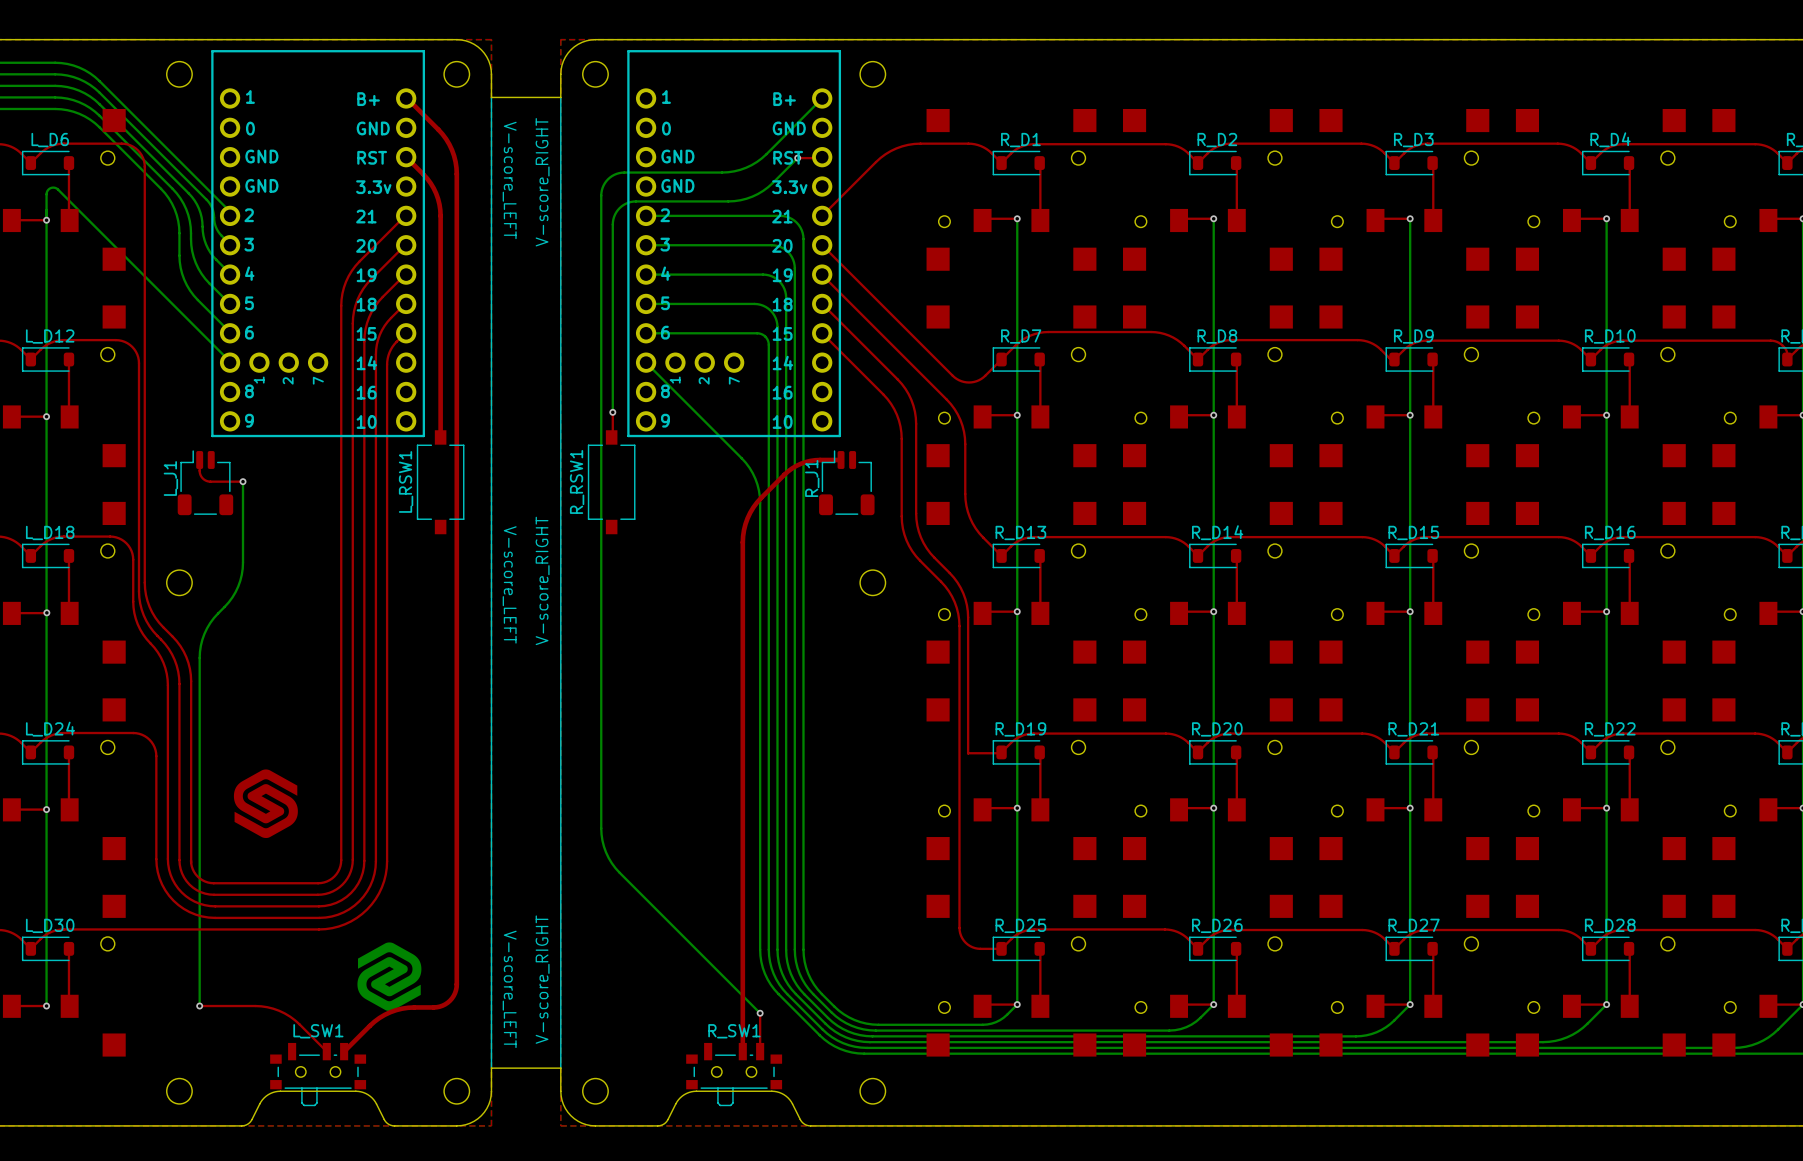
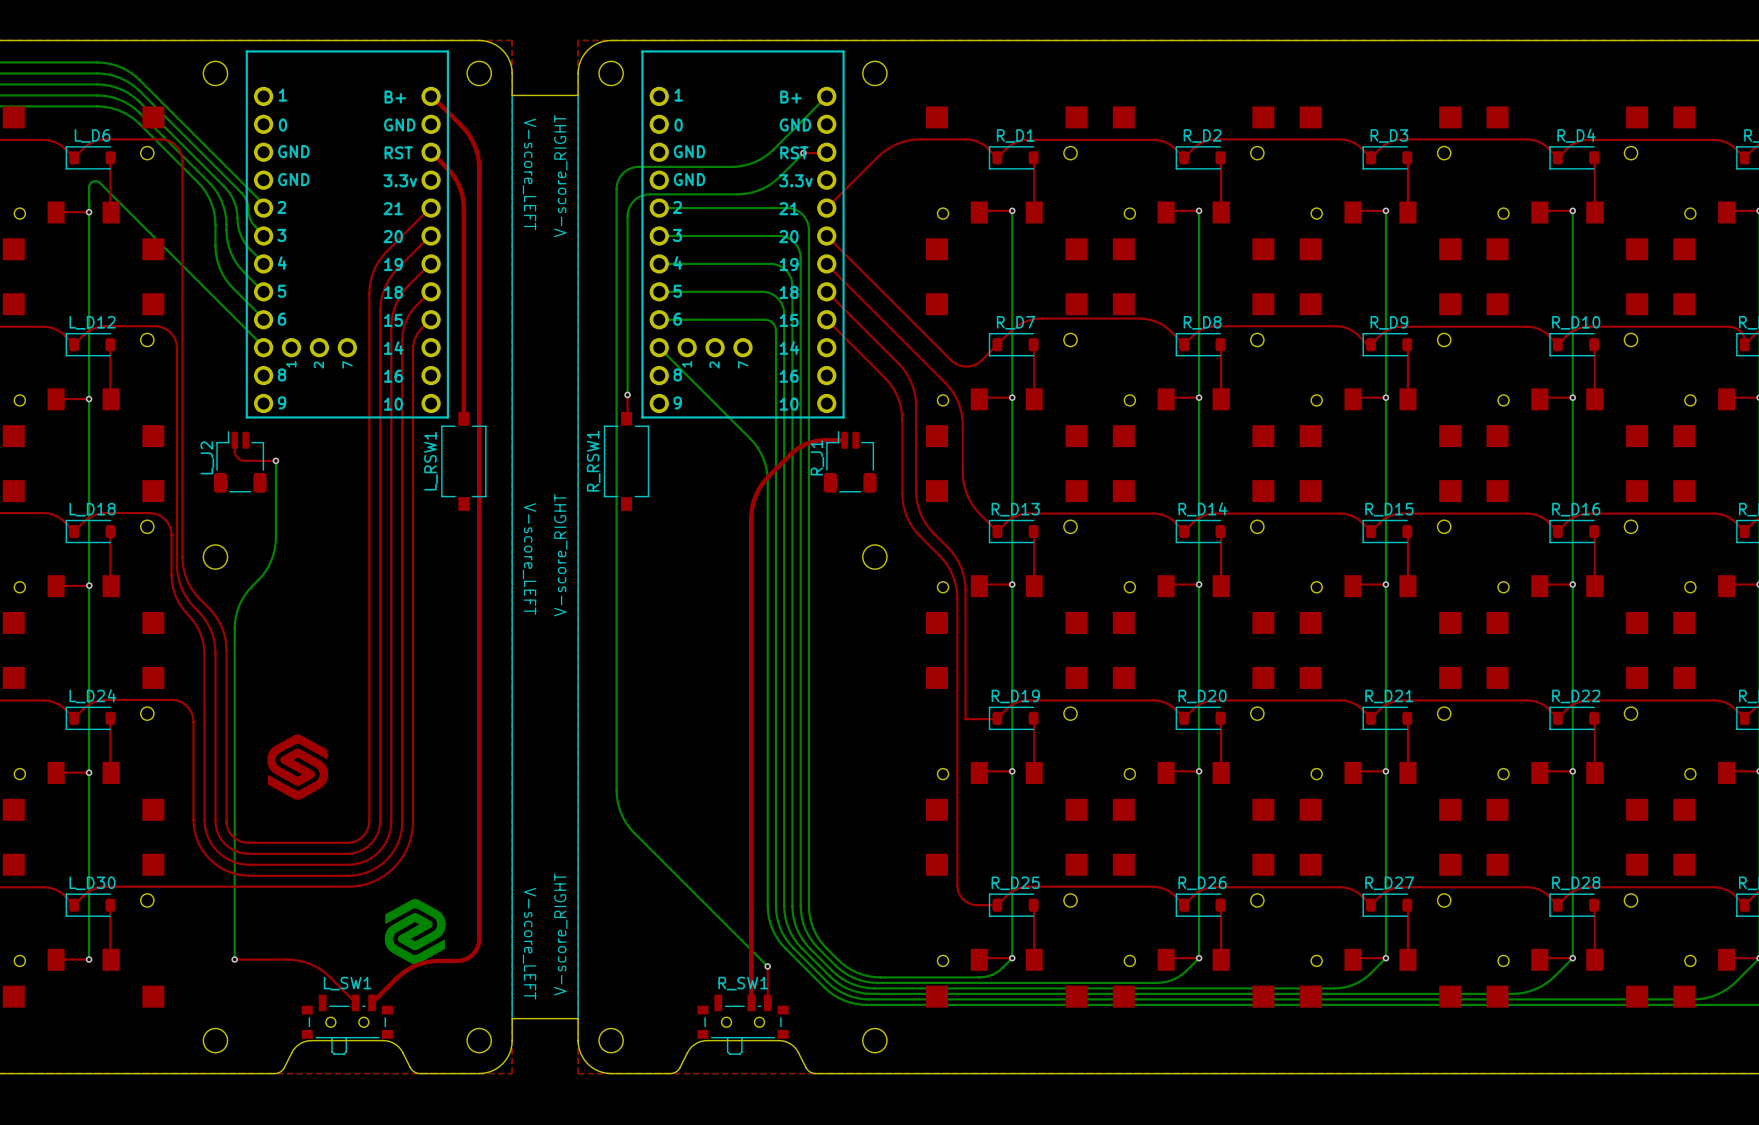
L_J1 name: L_J1 (170, 478) -> L_J2 (207, 457)

